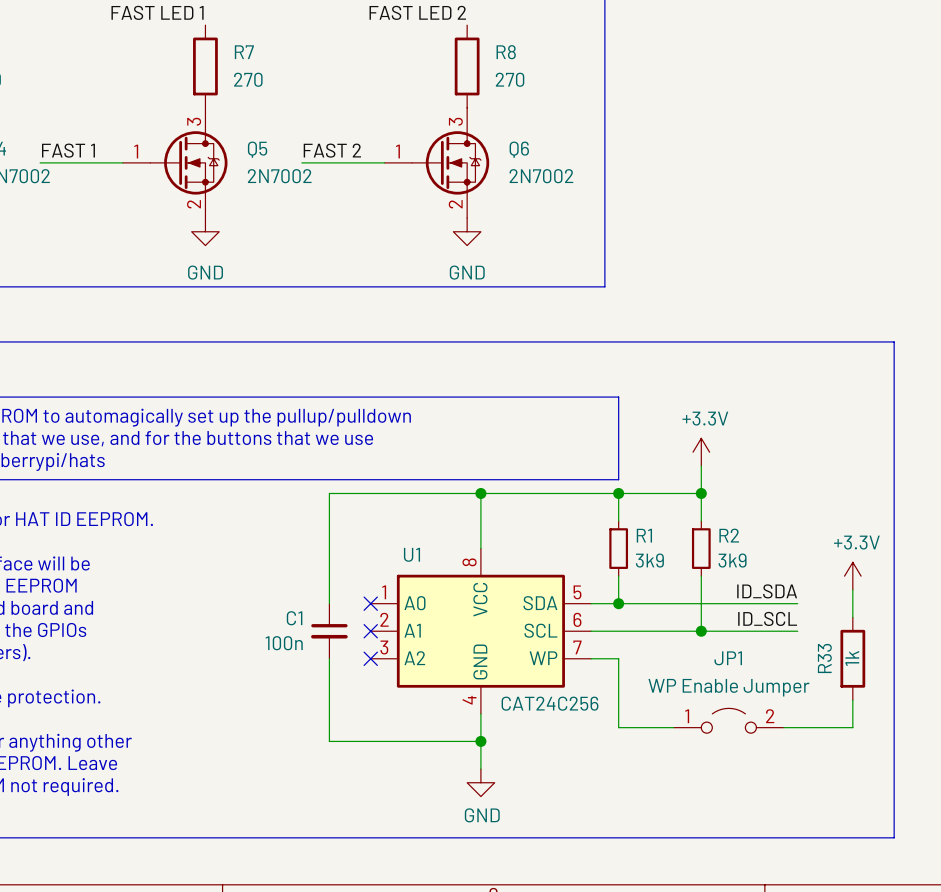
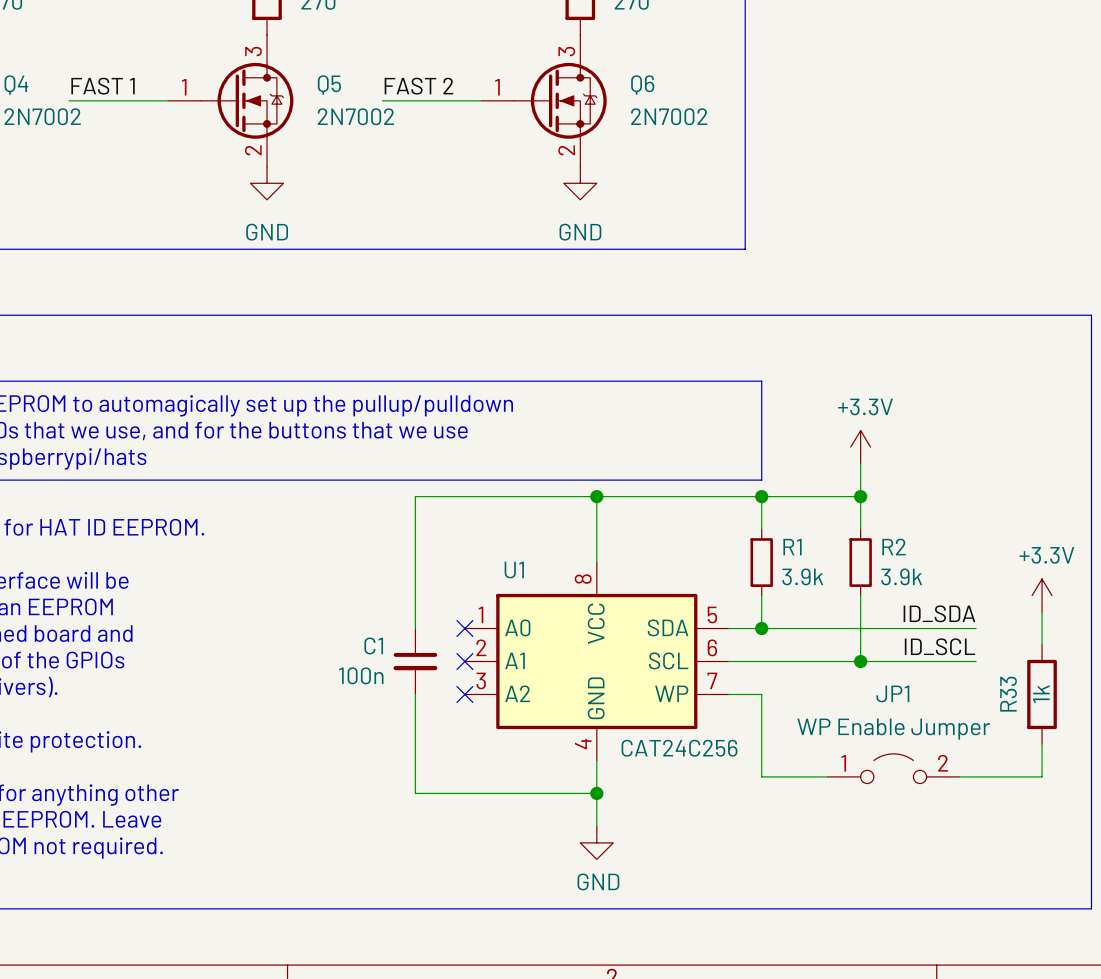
R1 value: 3k9 (649, 560) -> 3.9k (802, 576)
R2 value: 3k9 (732, 560) -> 3.9k (901, 576)

